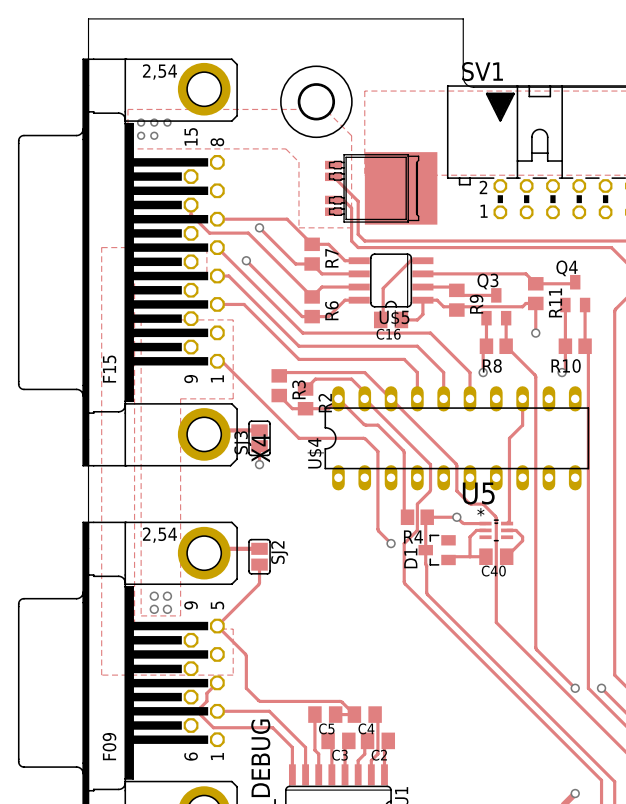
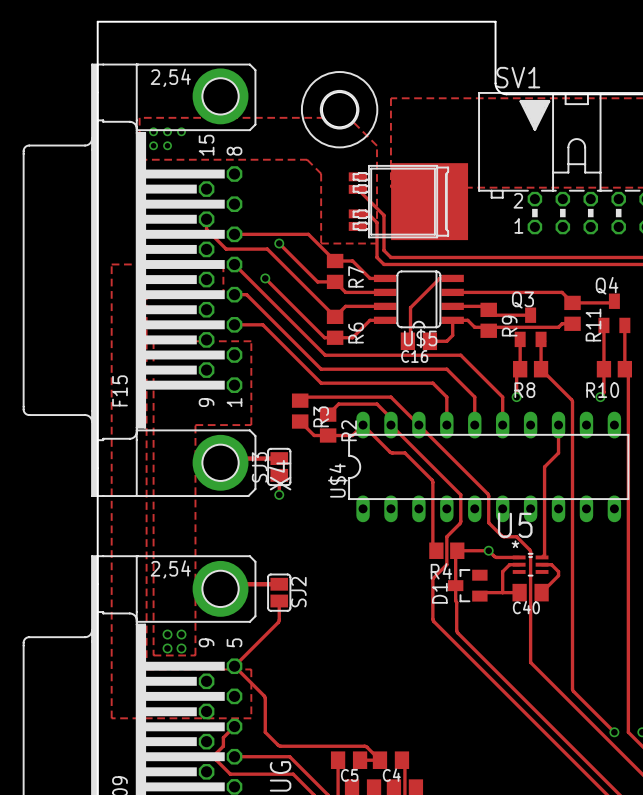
track: (535, 303) (535, 333) -> none
via: (535, 333) -> none
track: (217, 361) (222, 362) (298, 438) (363, 438) (377, 451) (377, 529) (391, 543) -> none
via: (391, 543) -> none

